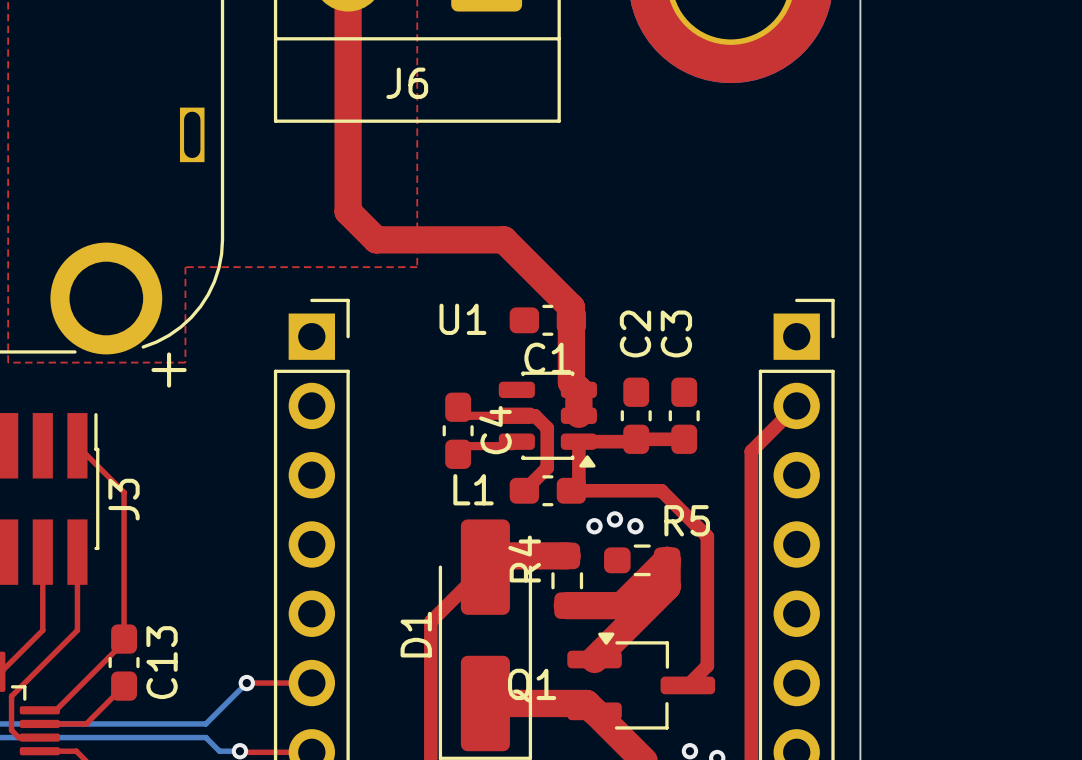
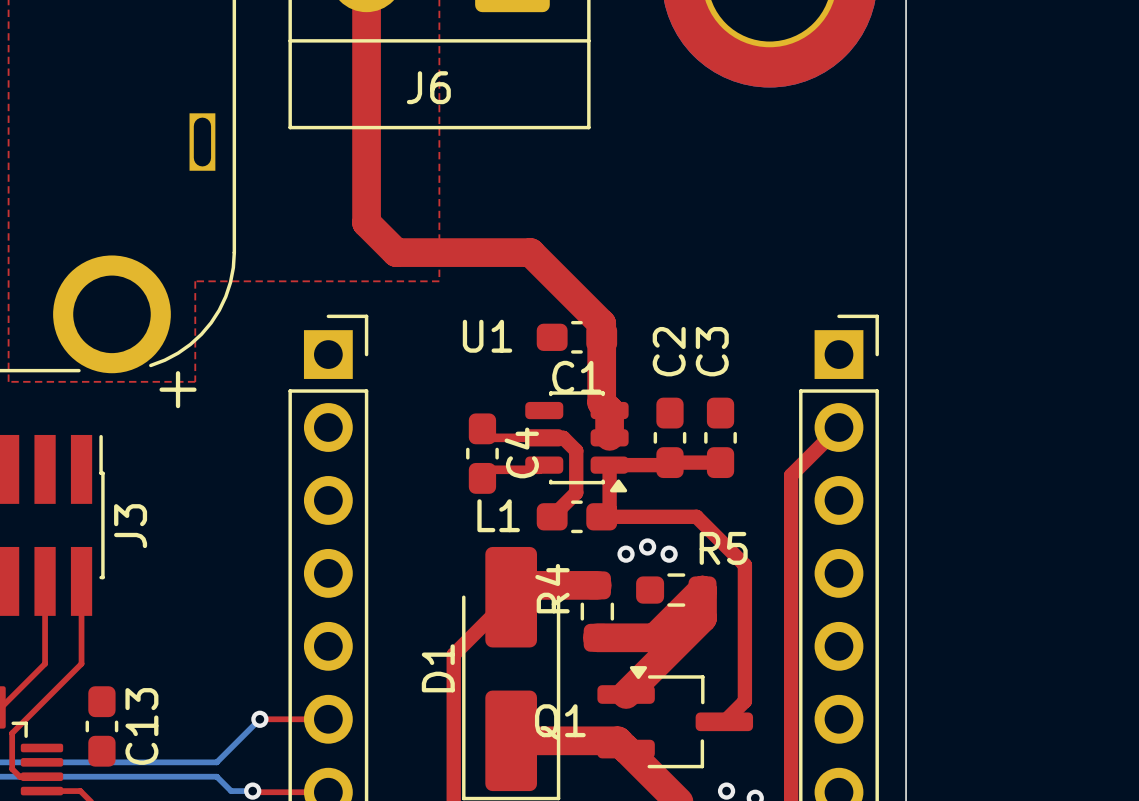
top track: (77, 445) (124, 492) (124, 642) (55, 710) (39, 710) -> none
C13 position: (124, 662) -> (101, 726)
top track: (124, 686) (86, 723) (39, 723) -> none

